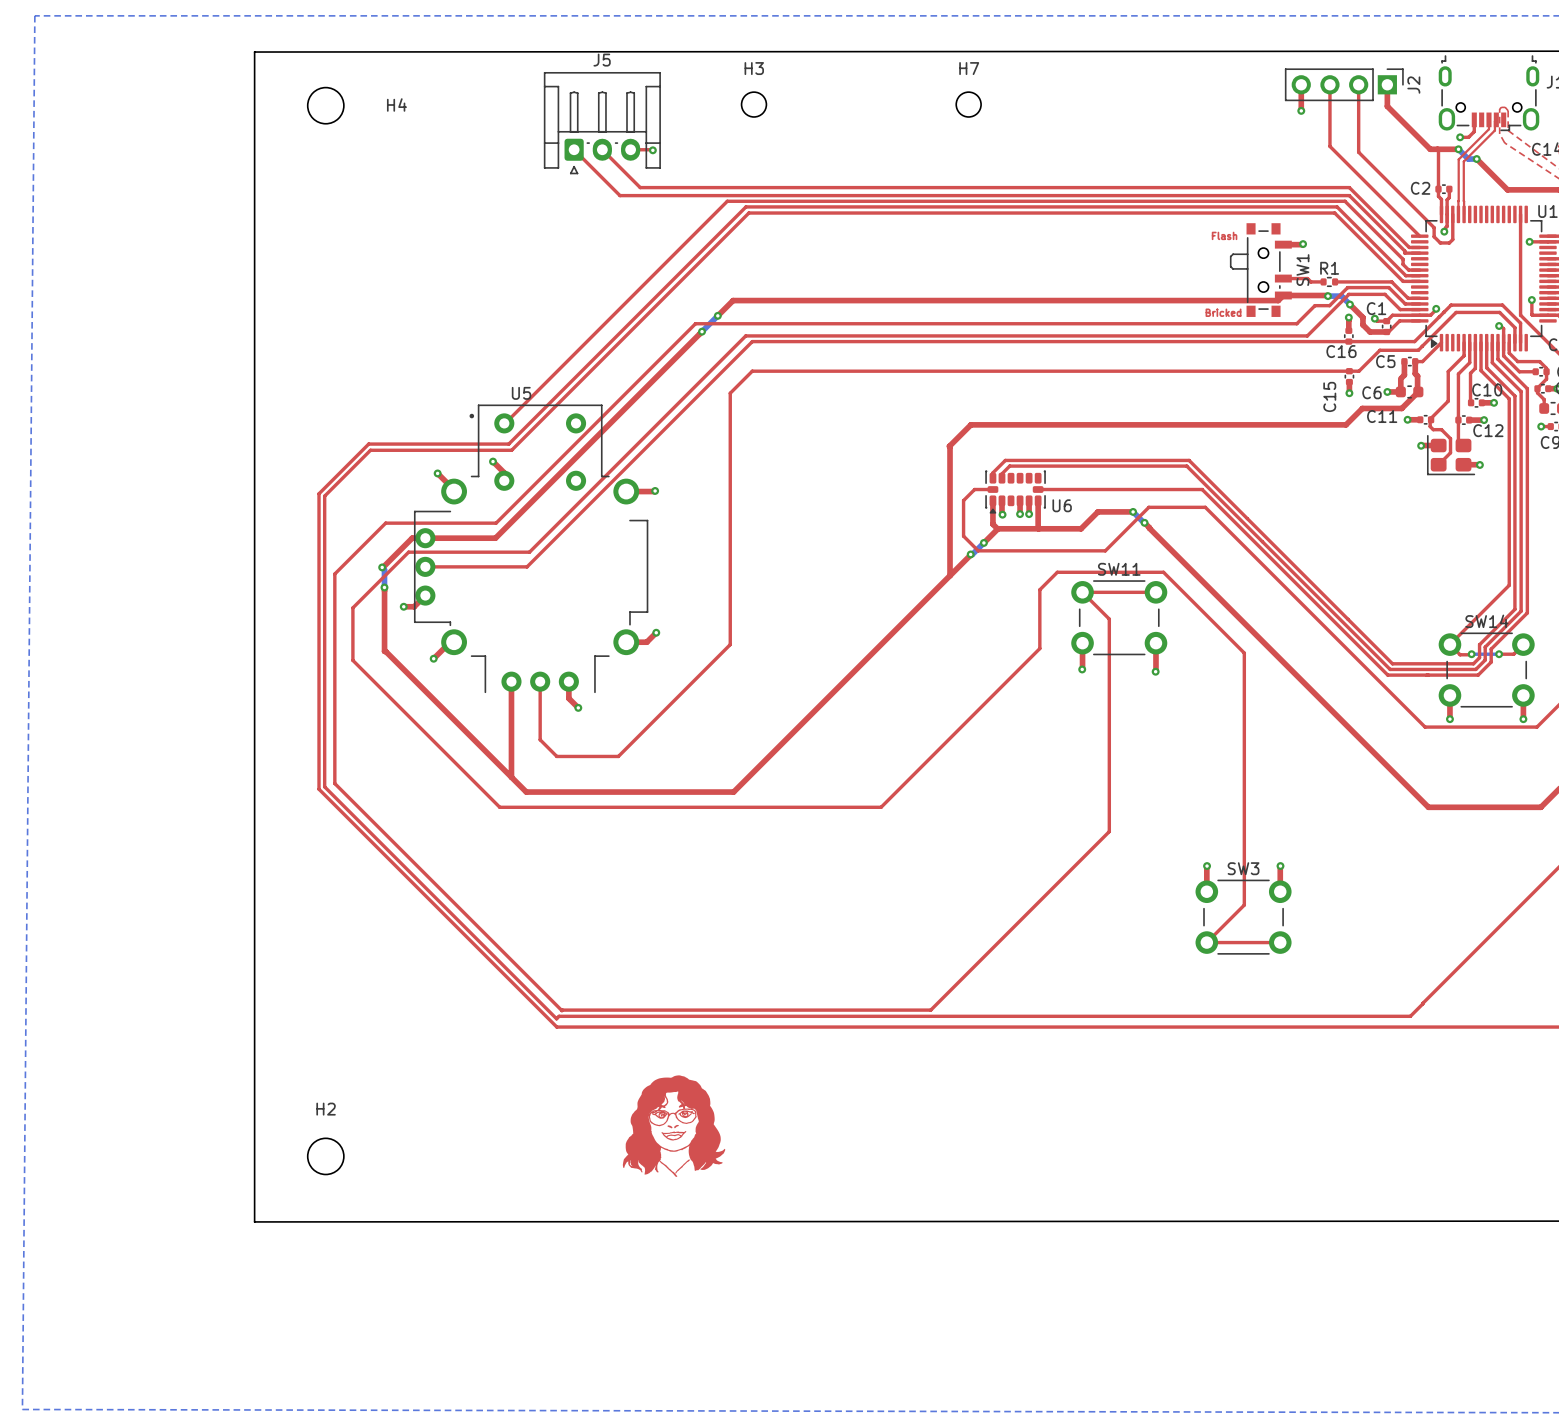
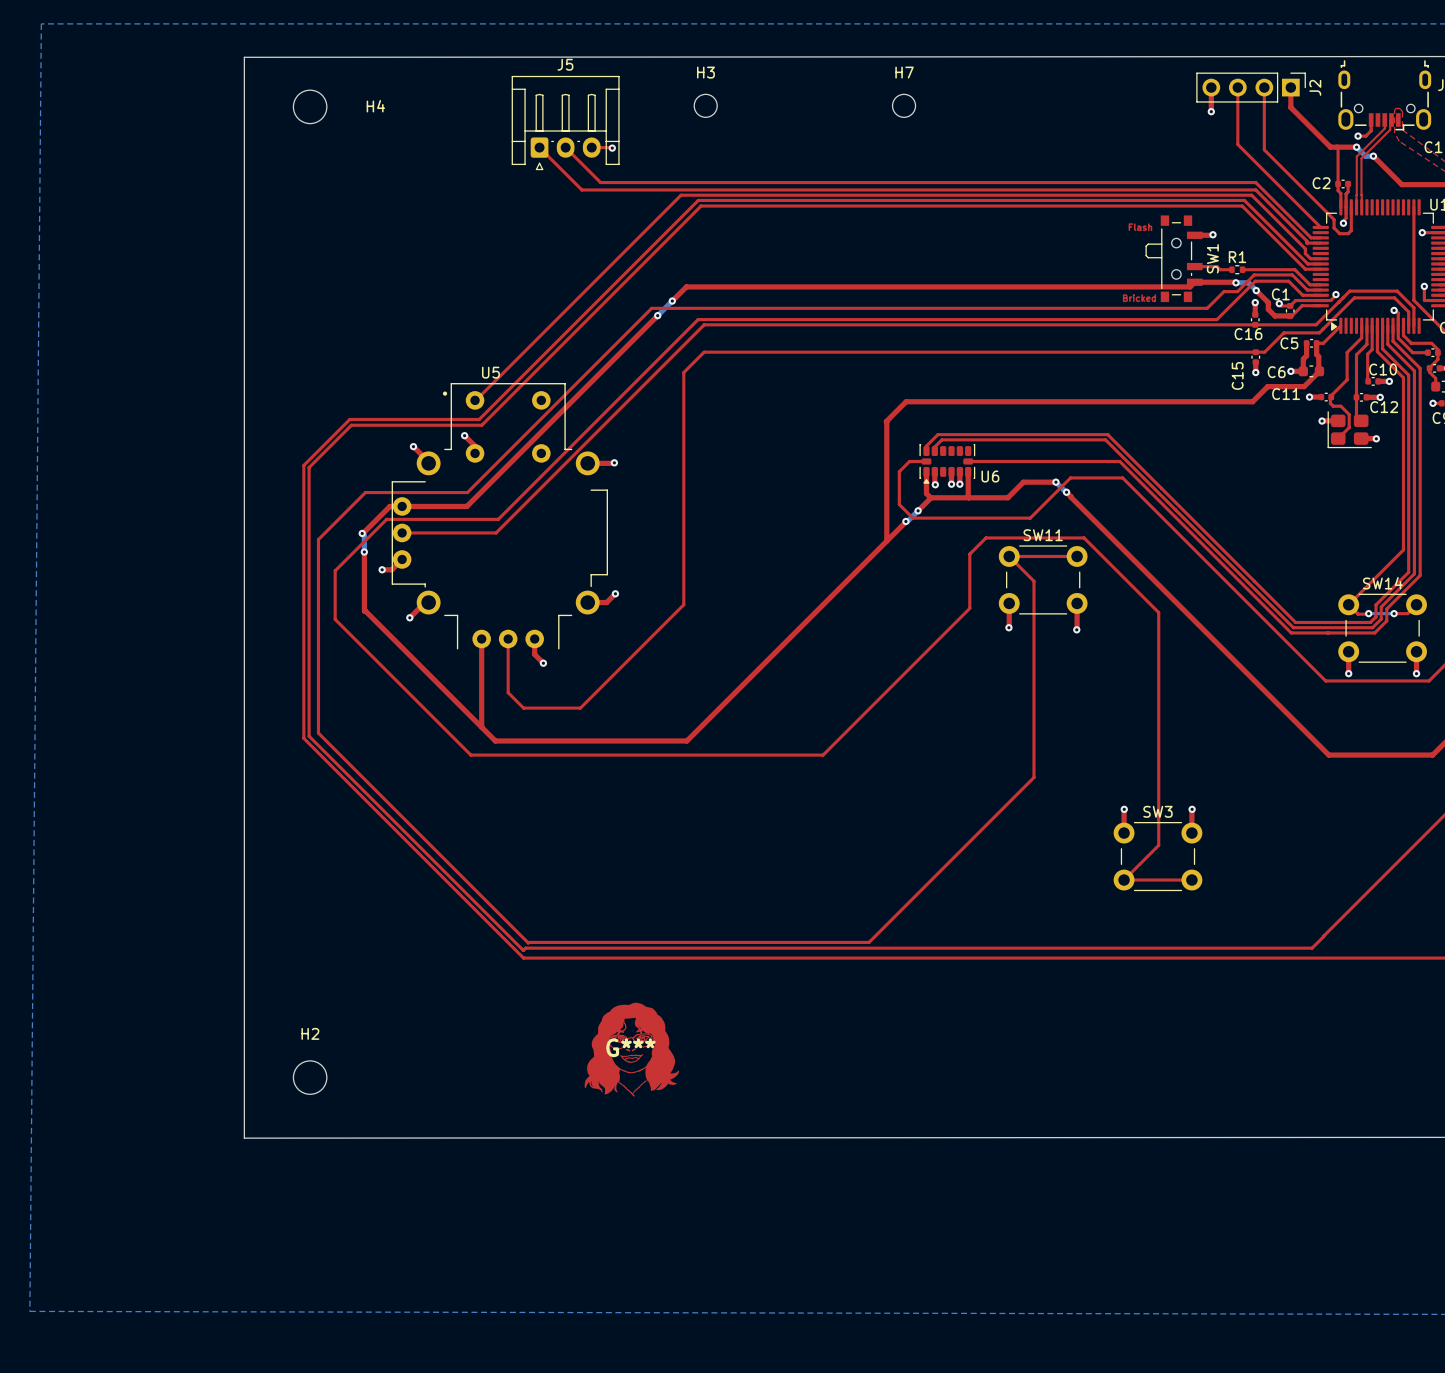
drawing: [622, 1075, 726, 1177] -> none
G***: none -> (631, 1049)

